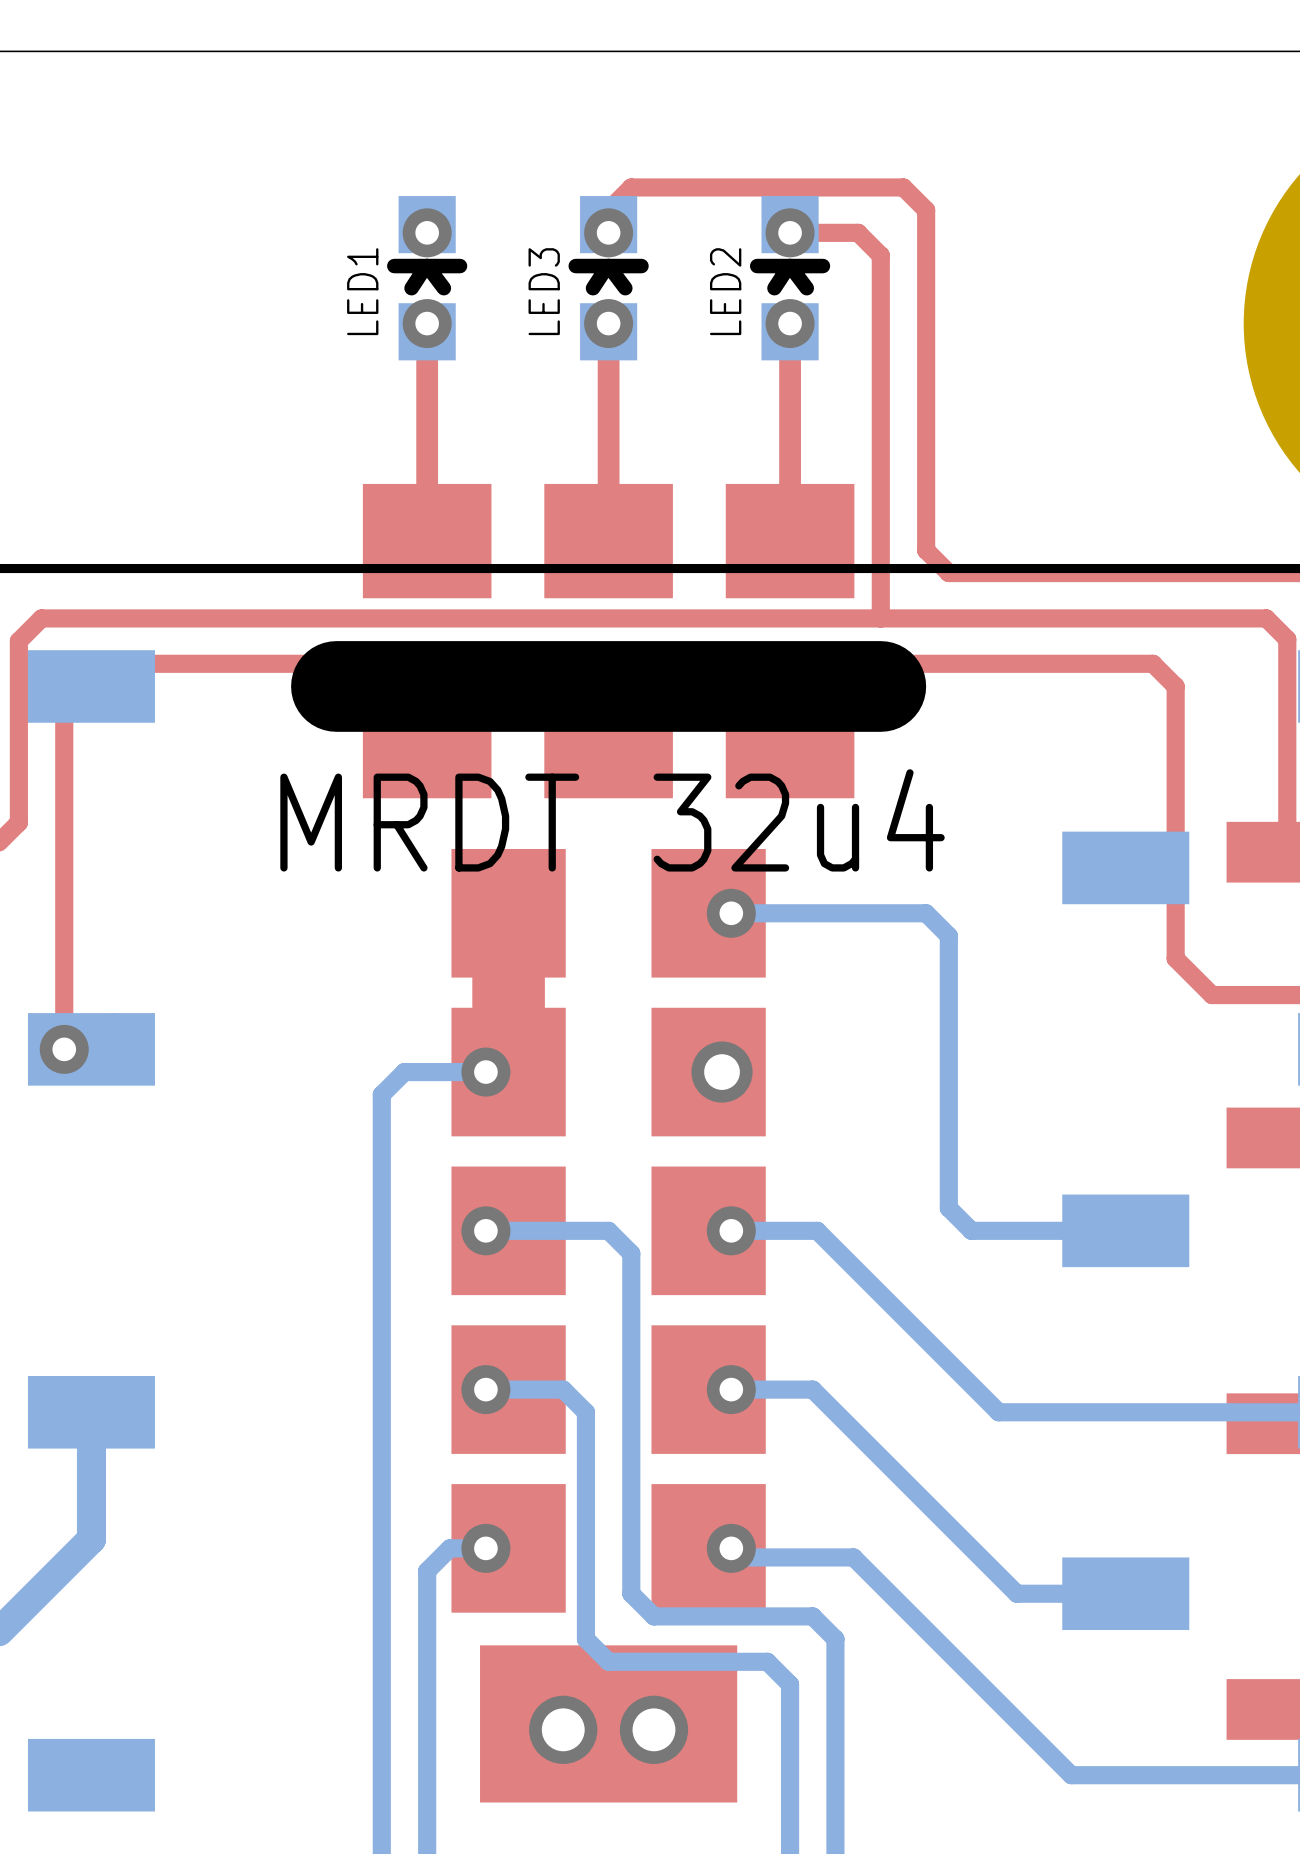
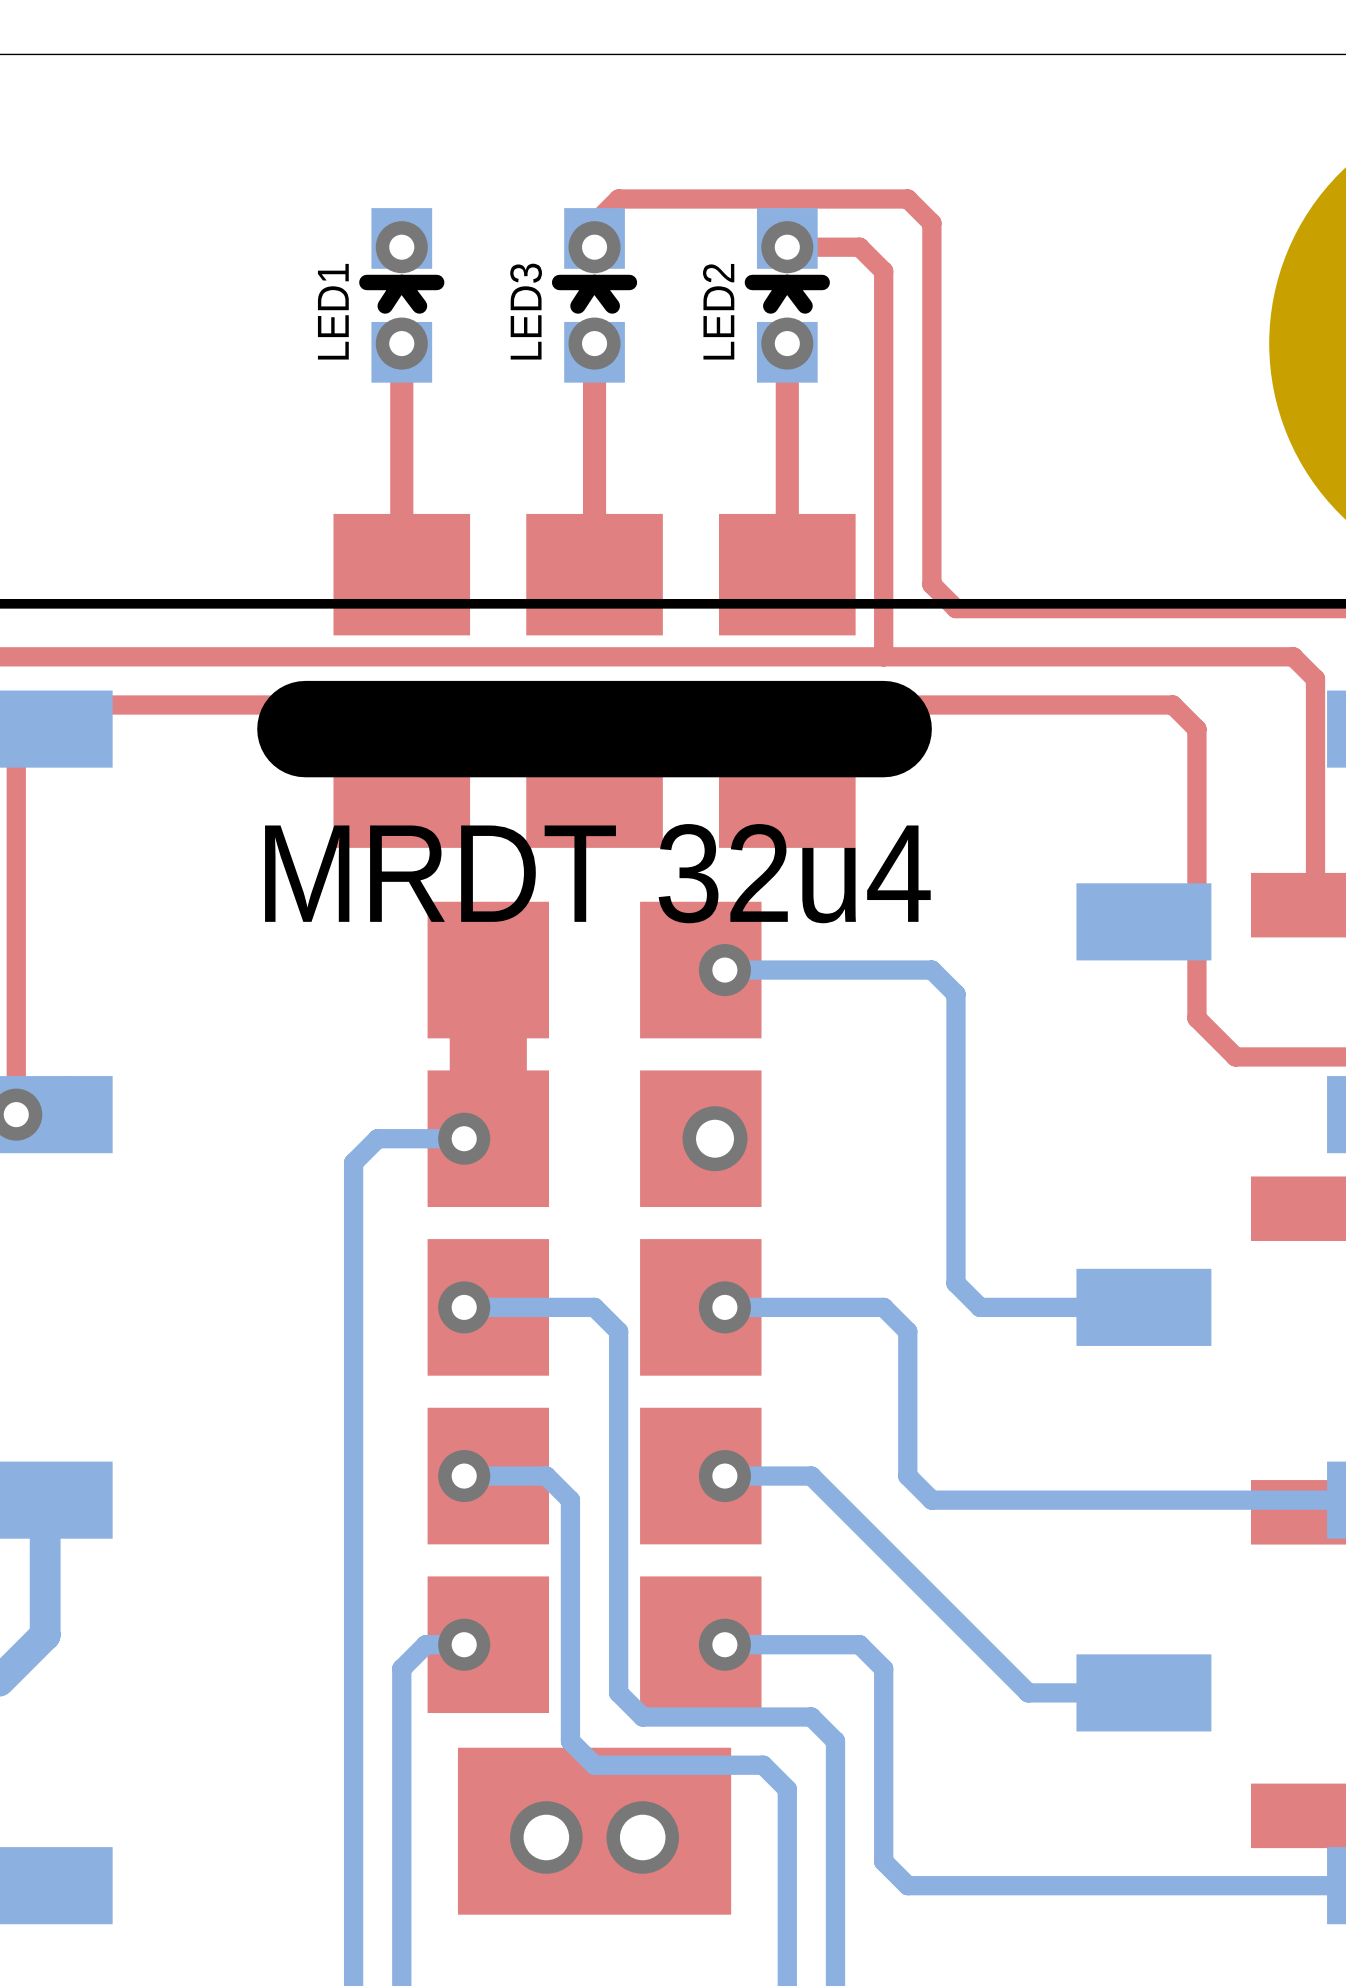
bottom track: (817, 1230) (998, 1412) -> (816, 1307) (883, 1307) (907, 1331) (907, 1476) (931, 1500) (1008, 1500)
bottom track: (731, 1548) (740, 1557) (853, 1557) (1071, 1775) -> (724, 1644) (859, 1644) (883, 1668) (883, 1861) (907, 1885) (1086, 1885)

